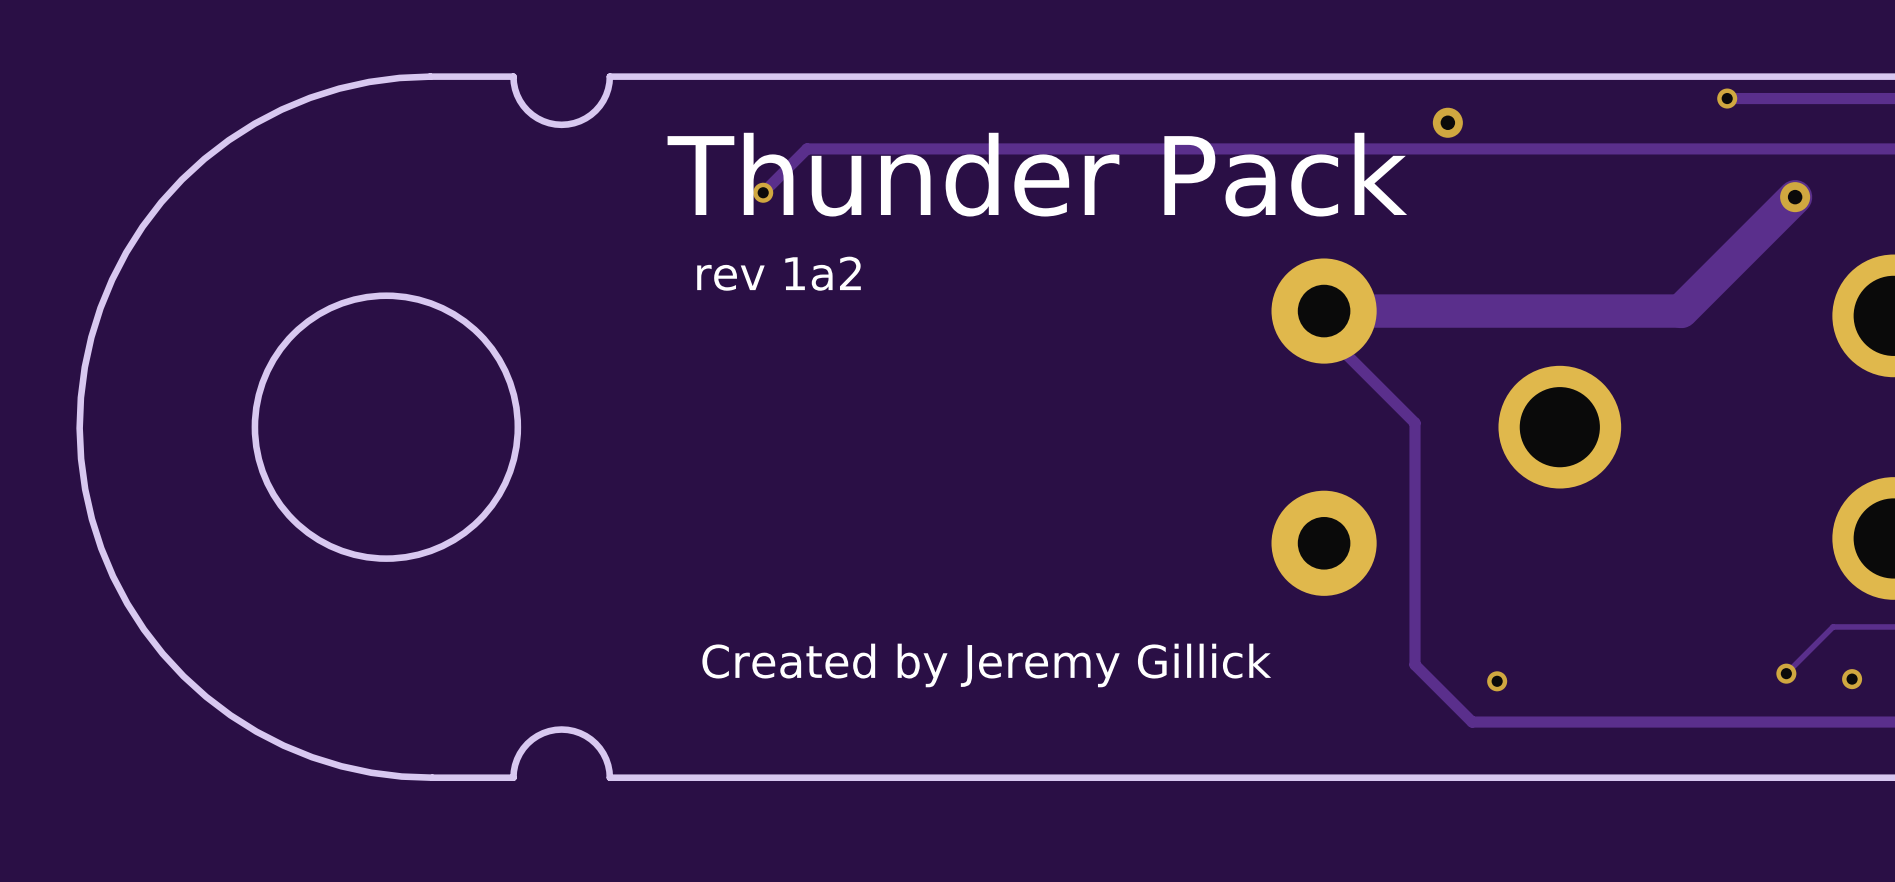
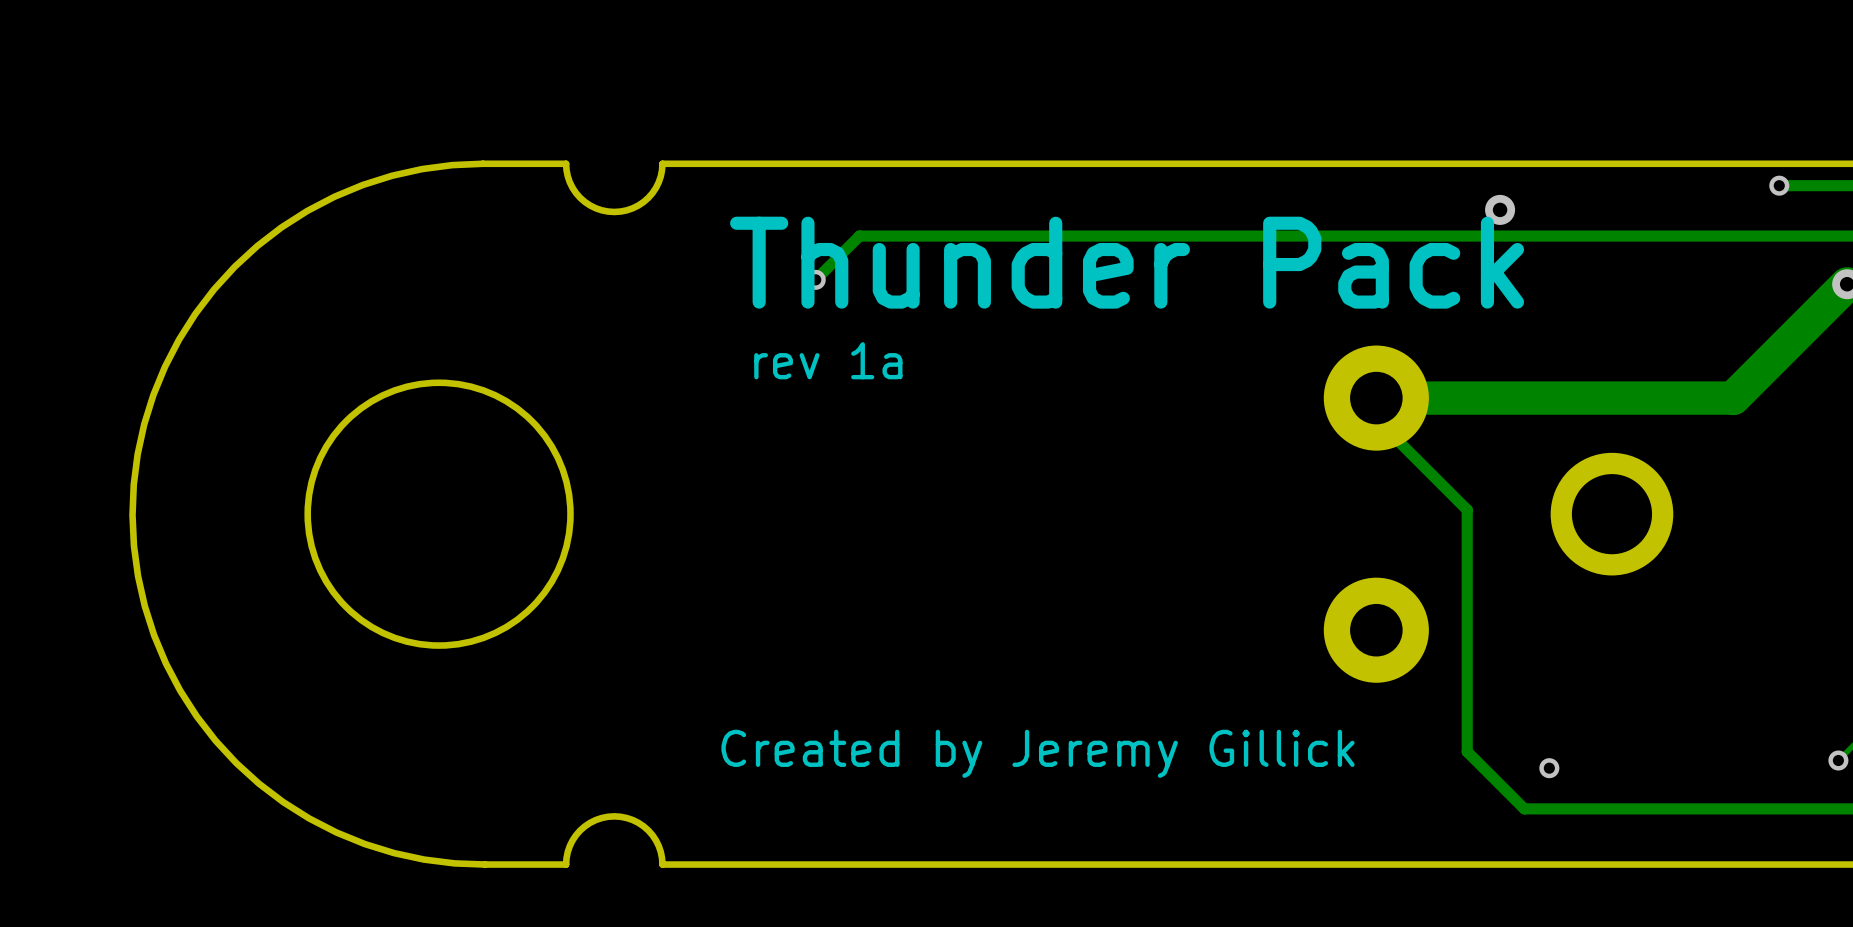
text: rev 1a2 (779, 273) -> rev 1a (828, 360)

